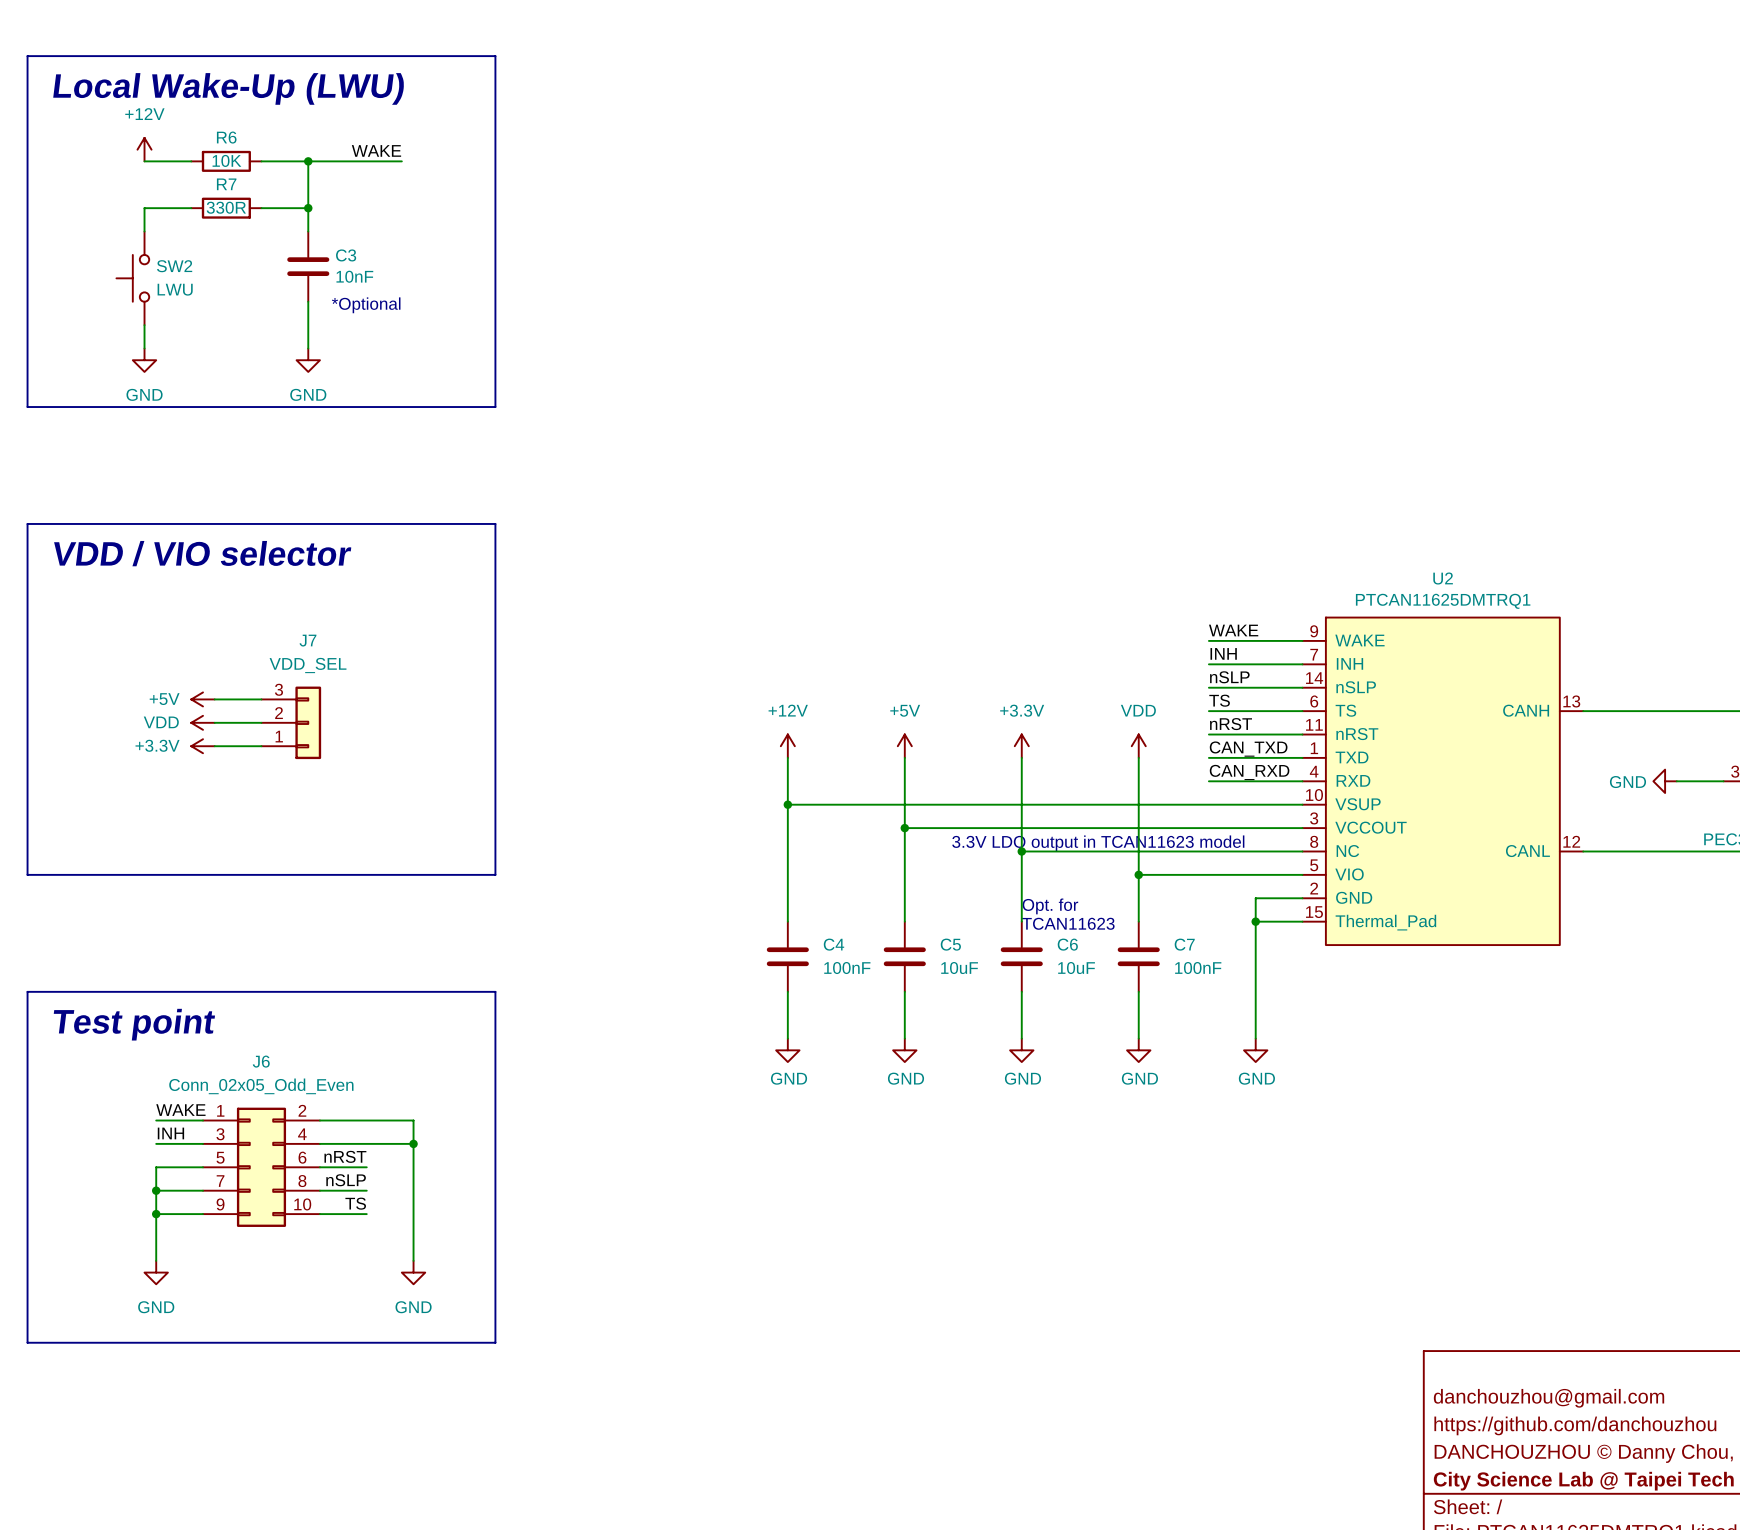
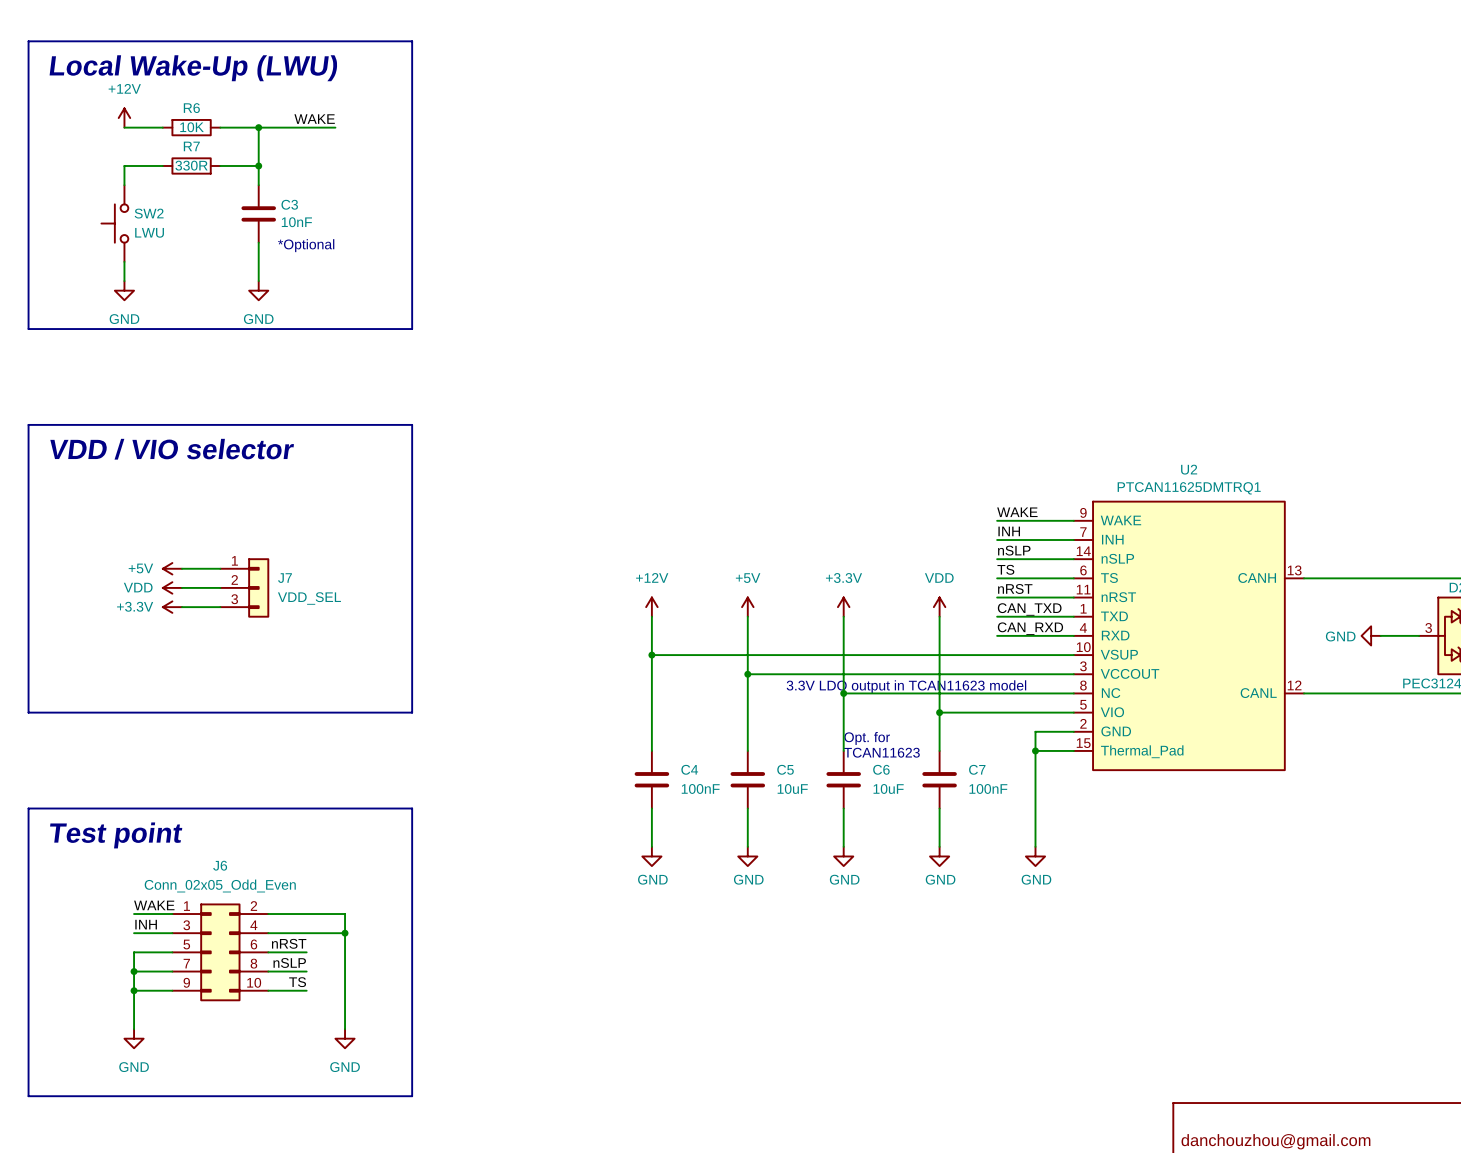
J7 name position: J7 (307, 640) -> J7 (285, 578)
J7 value position: VDD_SEL (308, 665) -> VDD_SEL (309, 598)
J7 flip: as is (308, 722) -> up-down (258, 587)

